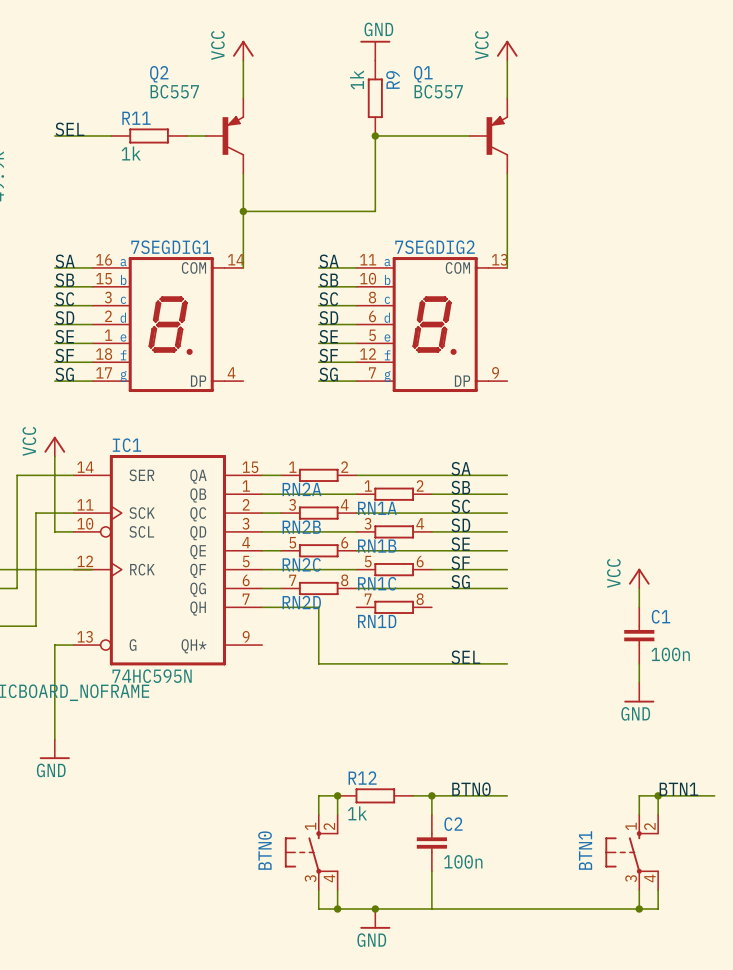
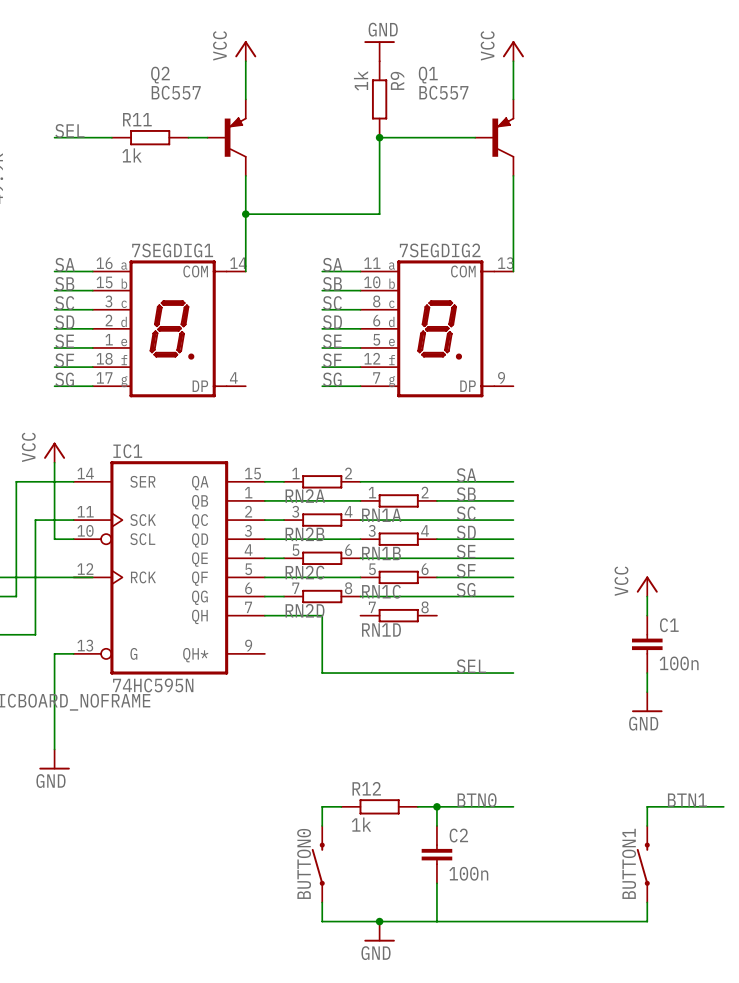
wire: (337, 795) (337, 814) -> none
junction: (337, 795) -> none
wire: (658, 795) (658, 814) -> none
junction: (658, 795) -> none
BTN0: (311, 852) -> none
BUTTON0: none -> (318, 864)
BTN1: (632, 852) -> none
BUTTON1: none -> (643, 864)
wire: (337, 890) (337, 909) -> none
wire: (658, 890) (658, 909) (639, 909) -> none
junction: (337, 909) -> none
junction: (639, 909) -> none

